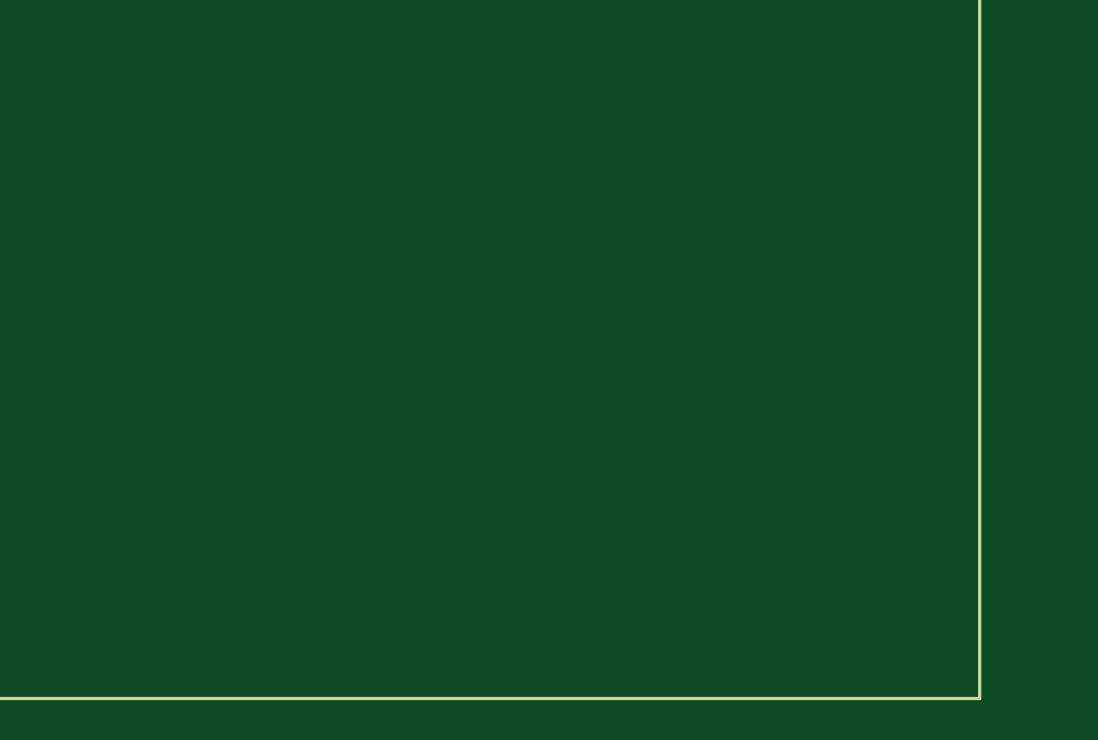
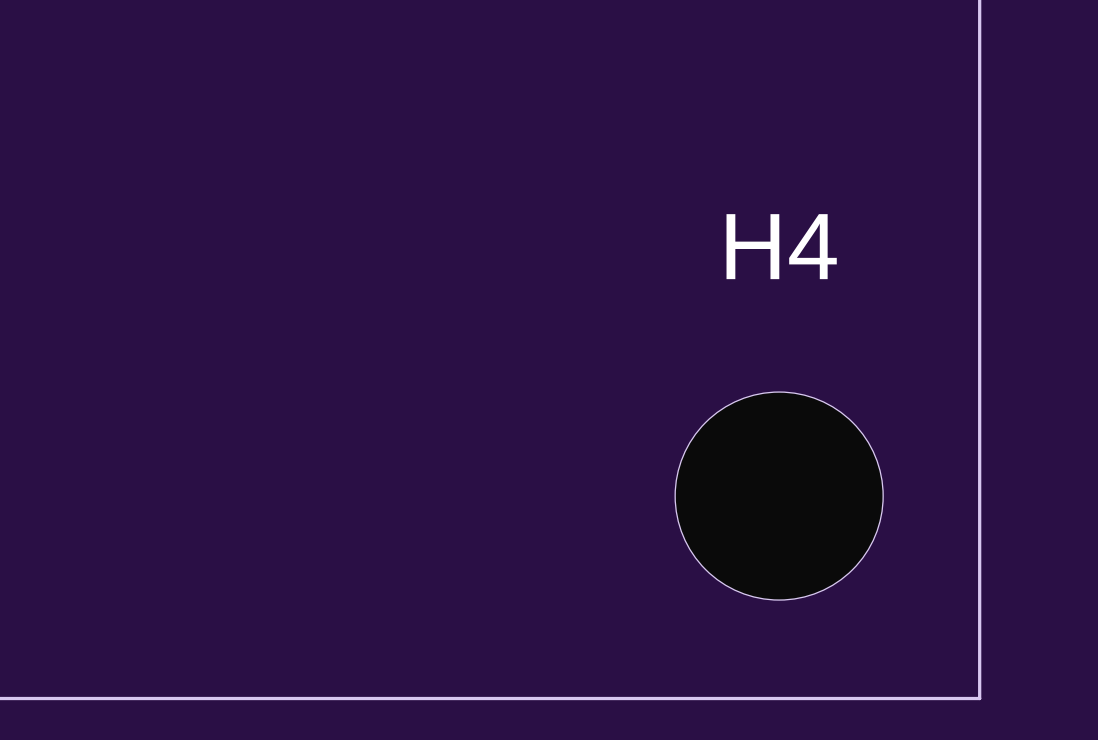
H4: none -> (779, 496)

